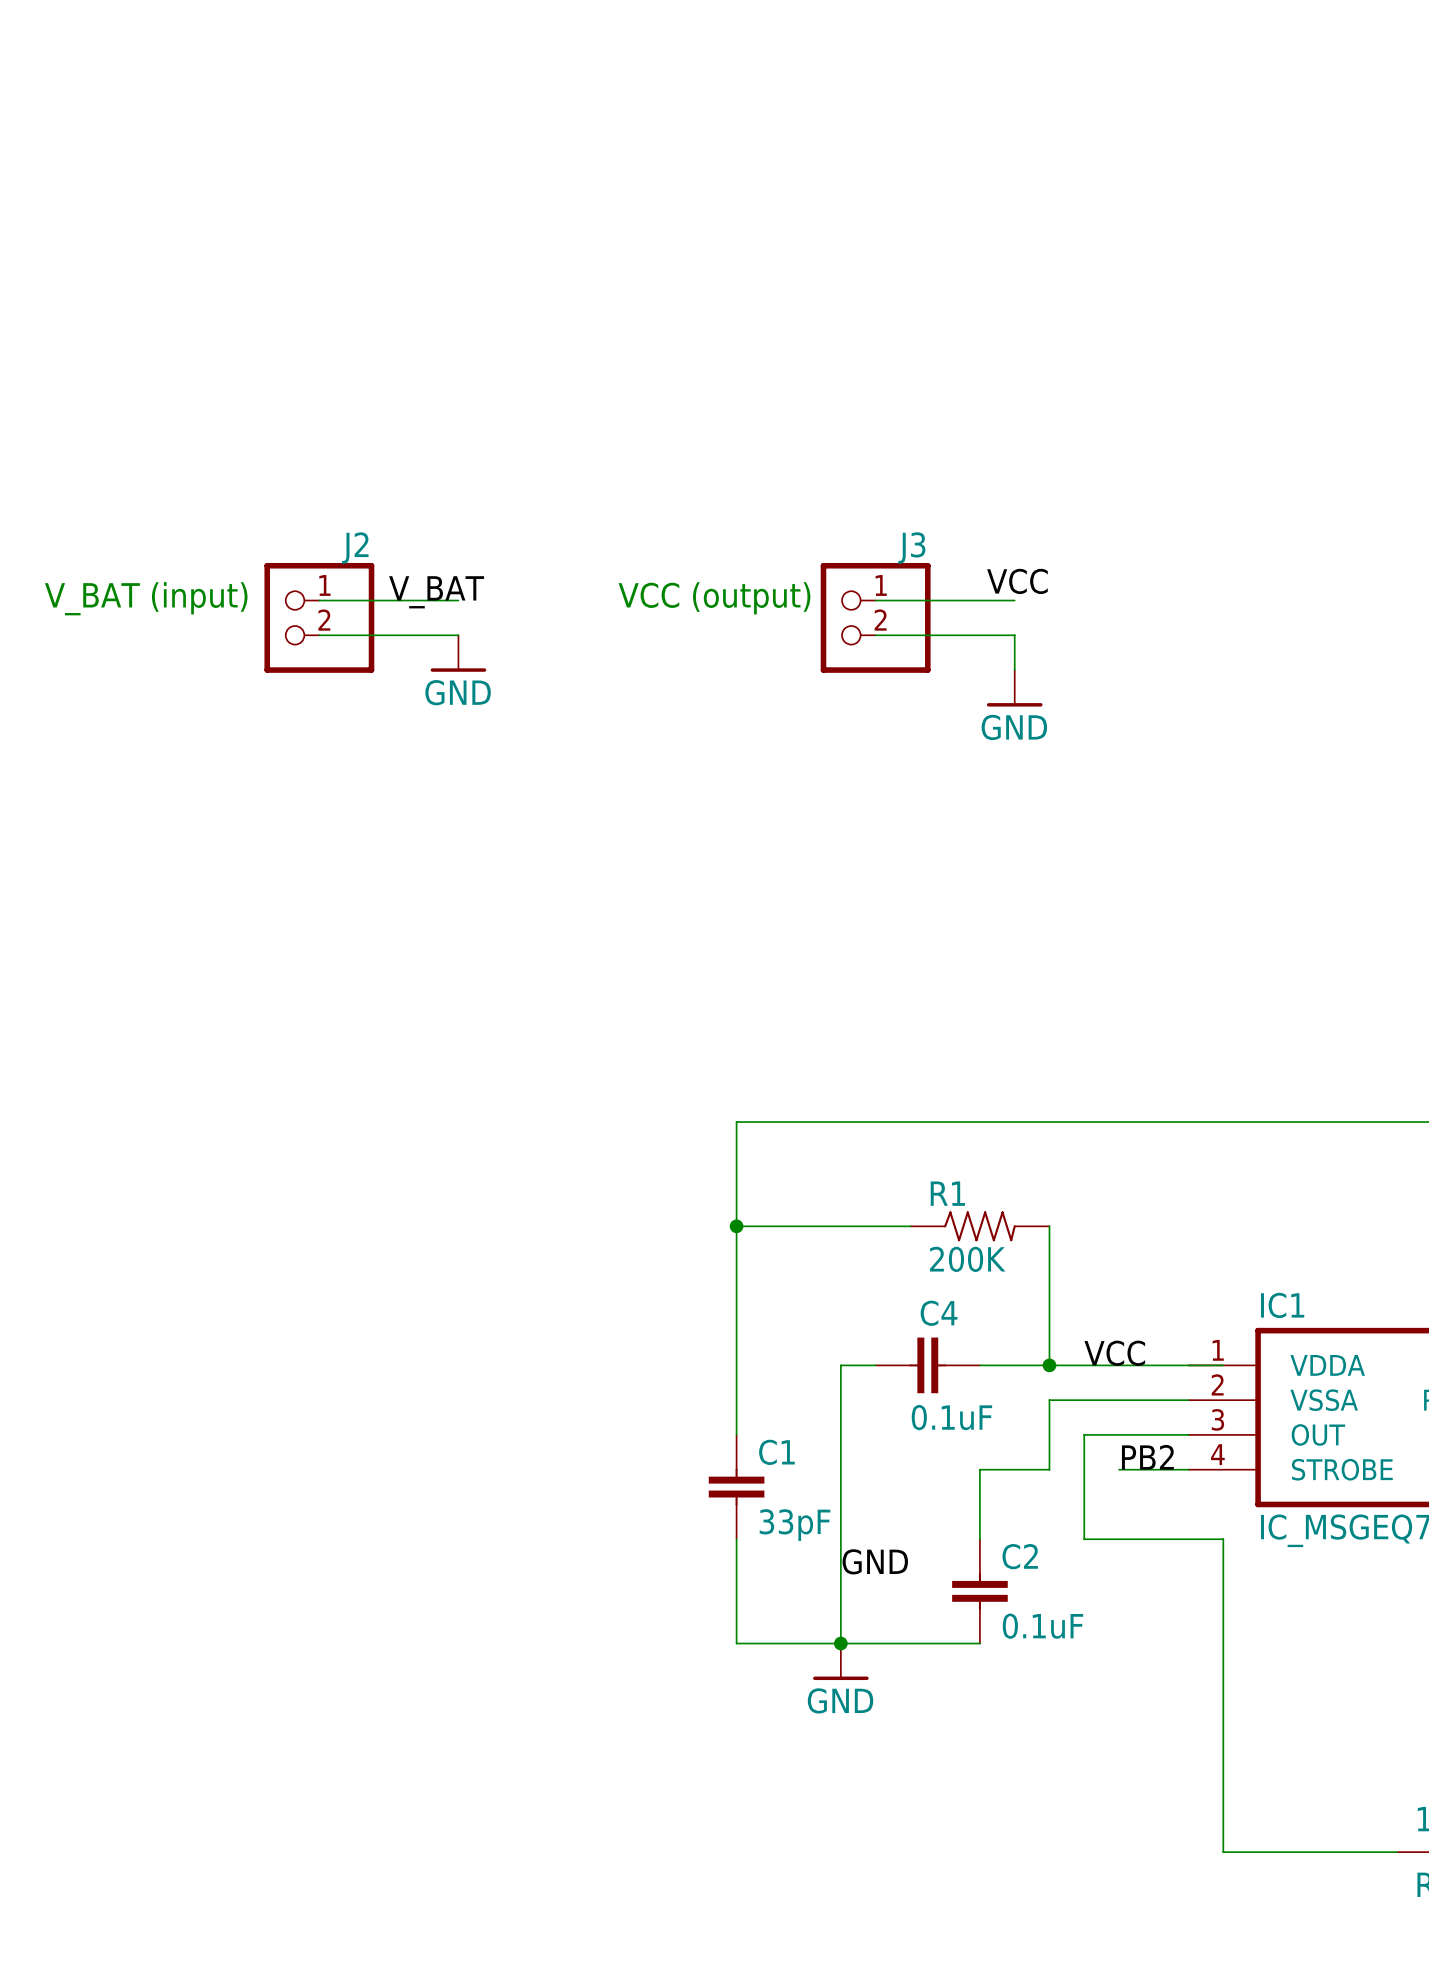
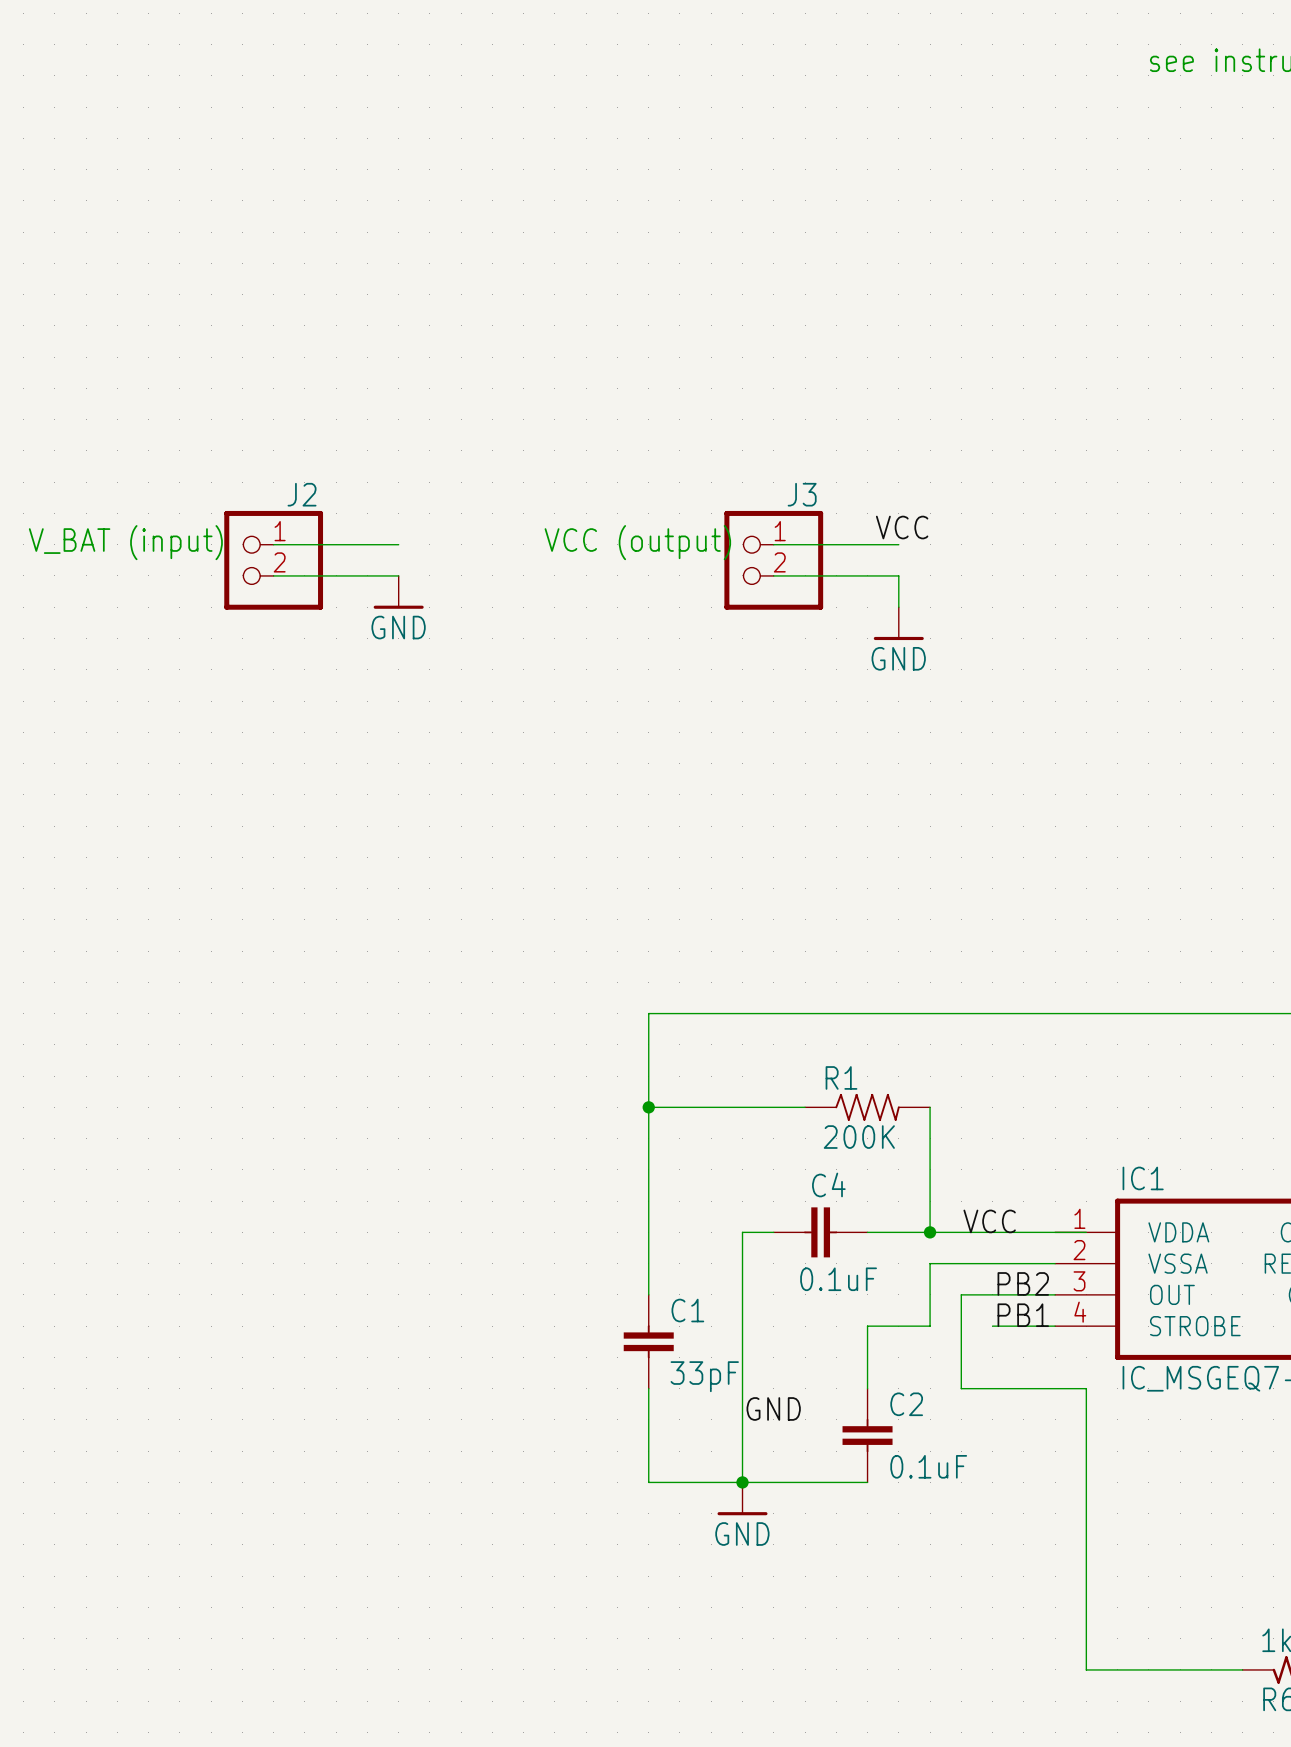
label: V_BAT (436, 592) -> none
label: none -> PB2 (1023, 1283)
label: PB2 (1147, 1457) -> PB1 (1023, 1315)

